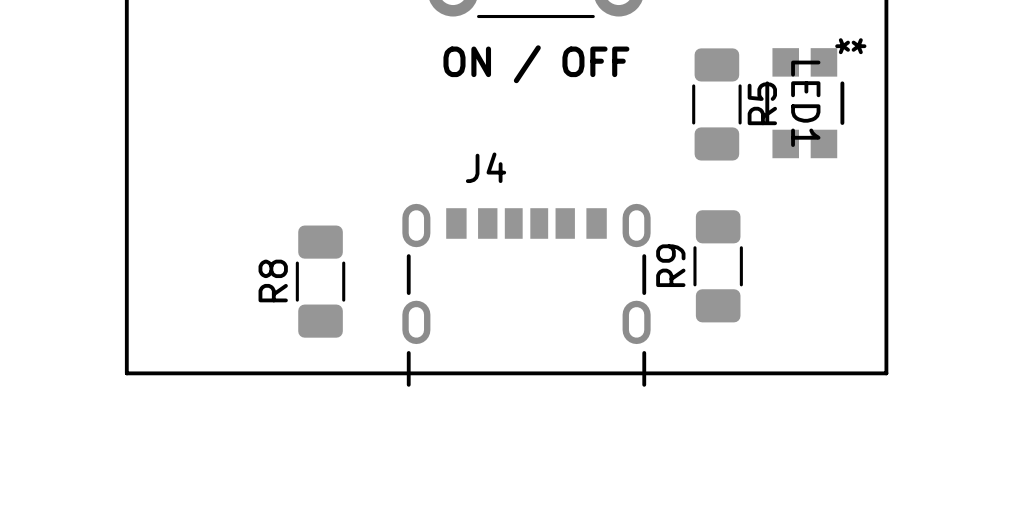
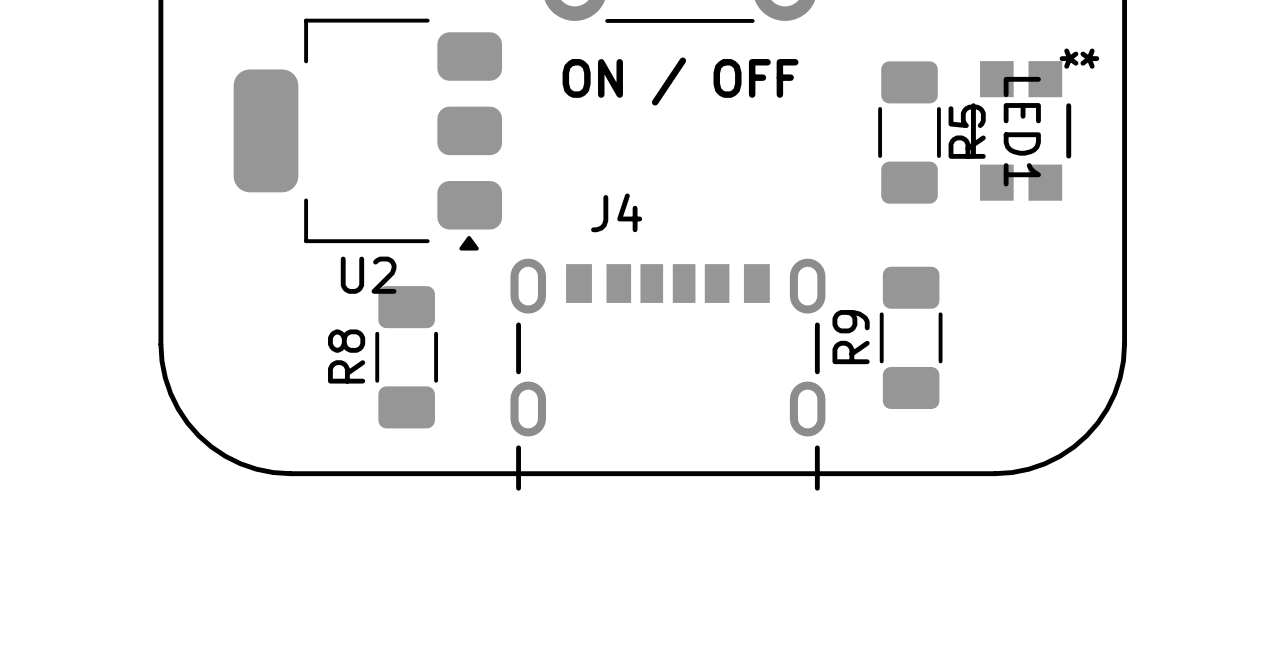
U2: none -> (367, 134)
board edge: (126, 271) (126, 373) (228, 373) -> (160, 344) (162, 361) (170, 393) (178, 409) (198, 435) (211, 446) (240, 463) (273, 472) (290, 473)
board edge: (886, 271) (886, 373) (784, 373) -> (1124, 344) (1123, 361) (1114, 393) (1107, 409) (1086, 435) (1073, 446) (1044, 463) (1012, 472) (995, 473)

